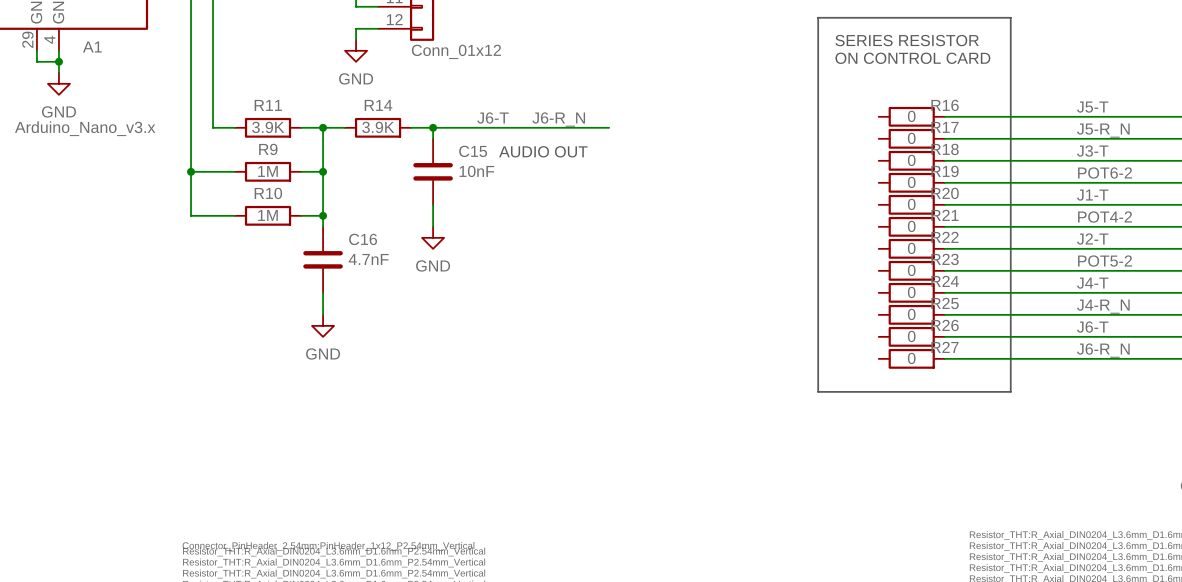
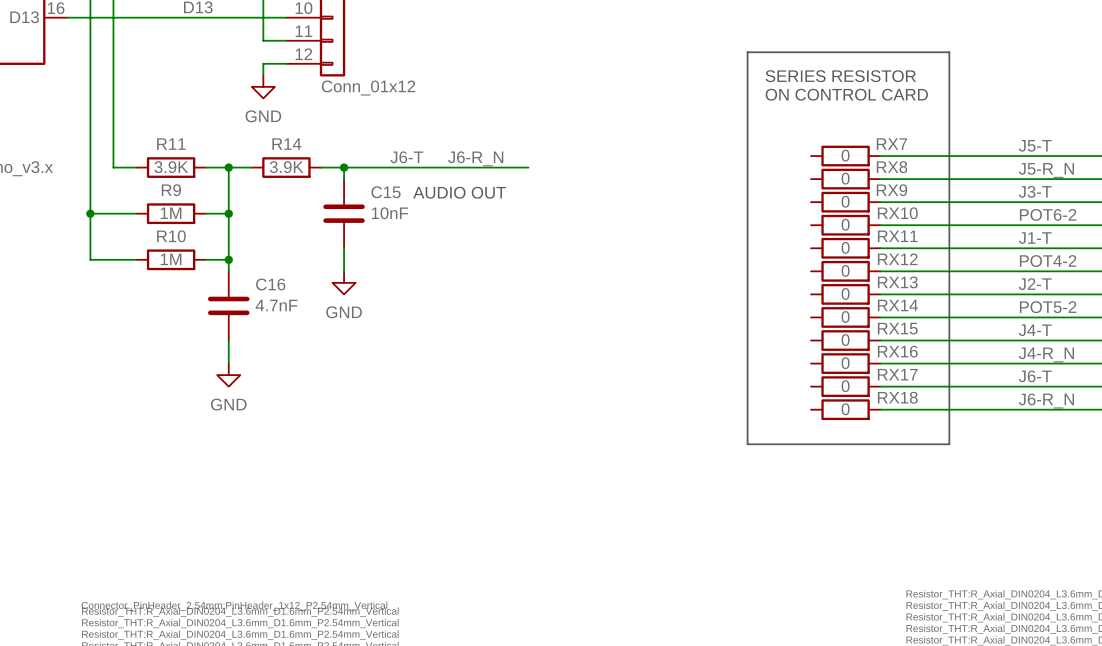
R16 name: R16 (945, 105) -> RX7 (891, 144)
R17 name: R17 (944, 127) -> RX8 (892, 167)
R18 name: R18 (945, 149) -> RX9 (891, 190)
R19 name: R19 (945, 171) -> RX10 (897, 213)
R20 name: R20 (945, 193) -> RX11 (897, 236)
R21 name: R21 (945, 215) -> RX12 (897, 259)
R22 name: R22 (944, 237) -> RX13 (897, 282)
R23 name: R23 (945, 259) -> RX14 (897, 305)
R24 name: R24 (945, 281) -> RX15 (897, 328)
R25 name: R25 (945, 303) -> RX16 (897, 351)
R26 name: R26 (945, 325) -> RX17 (897, 374)
R27 name: R27 (944, 347) -> RX18 (897, 397)

